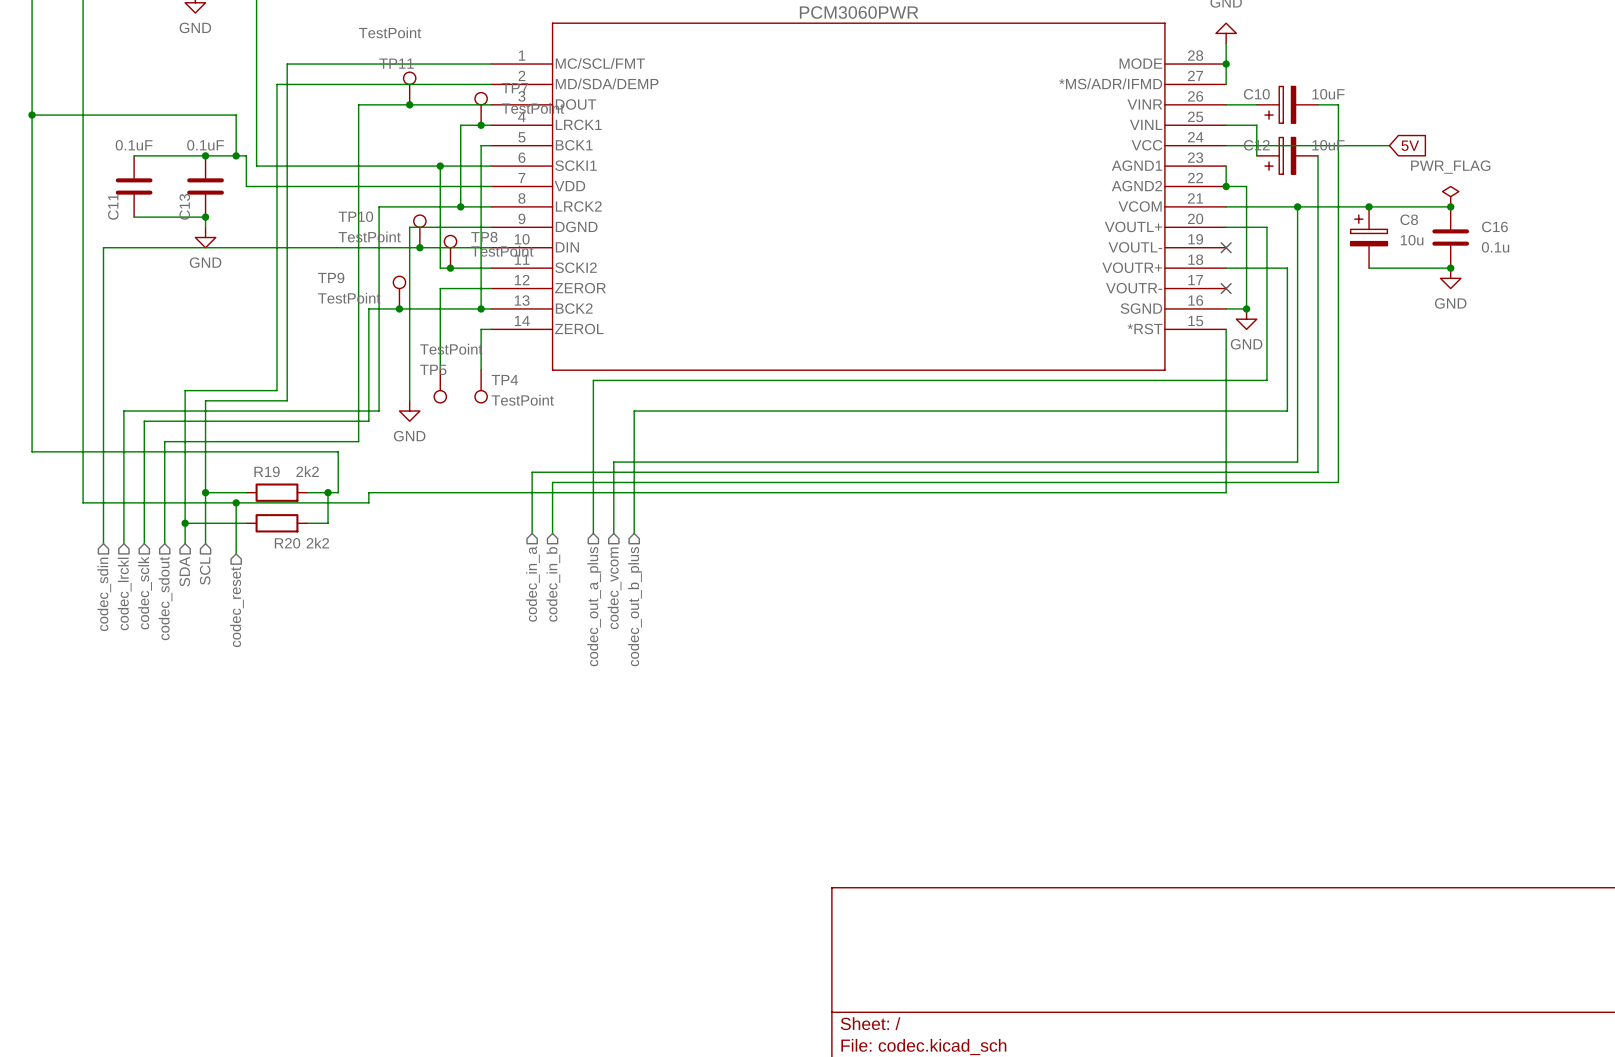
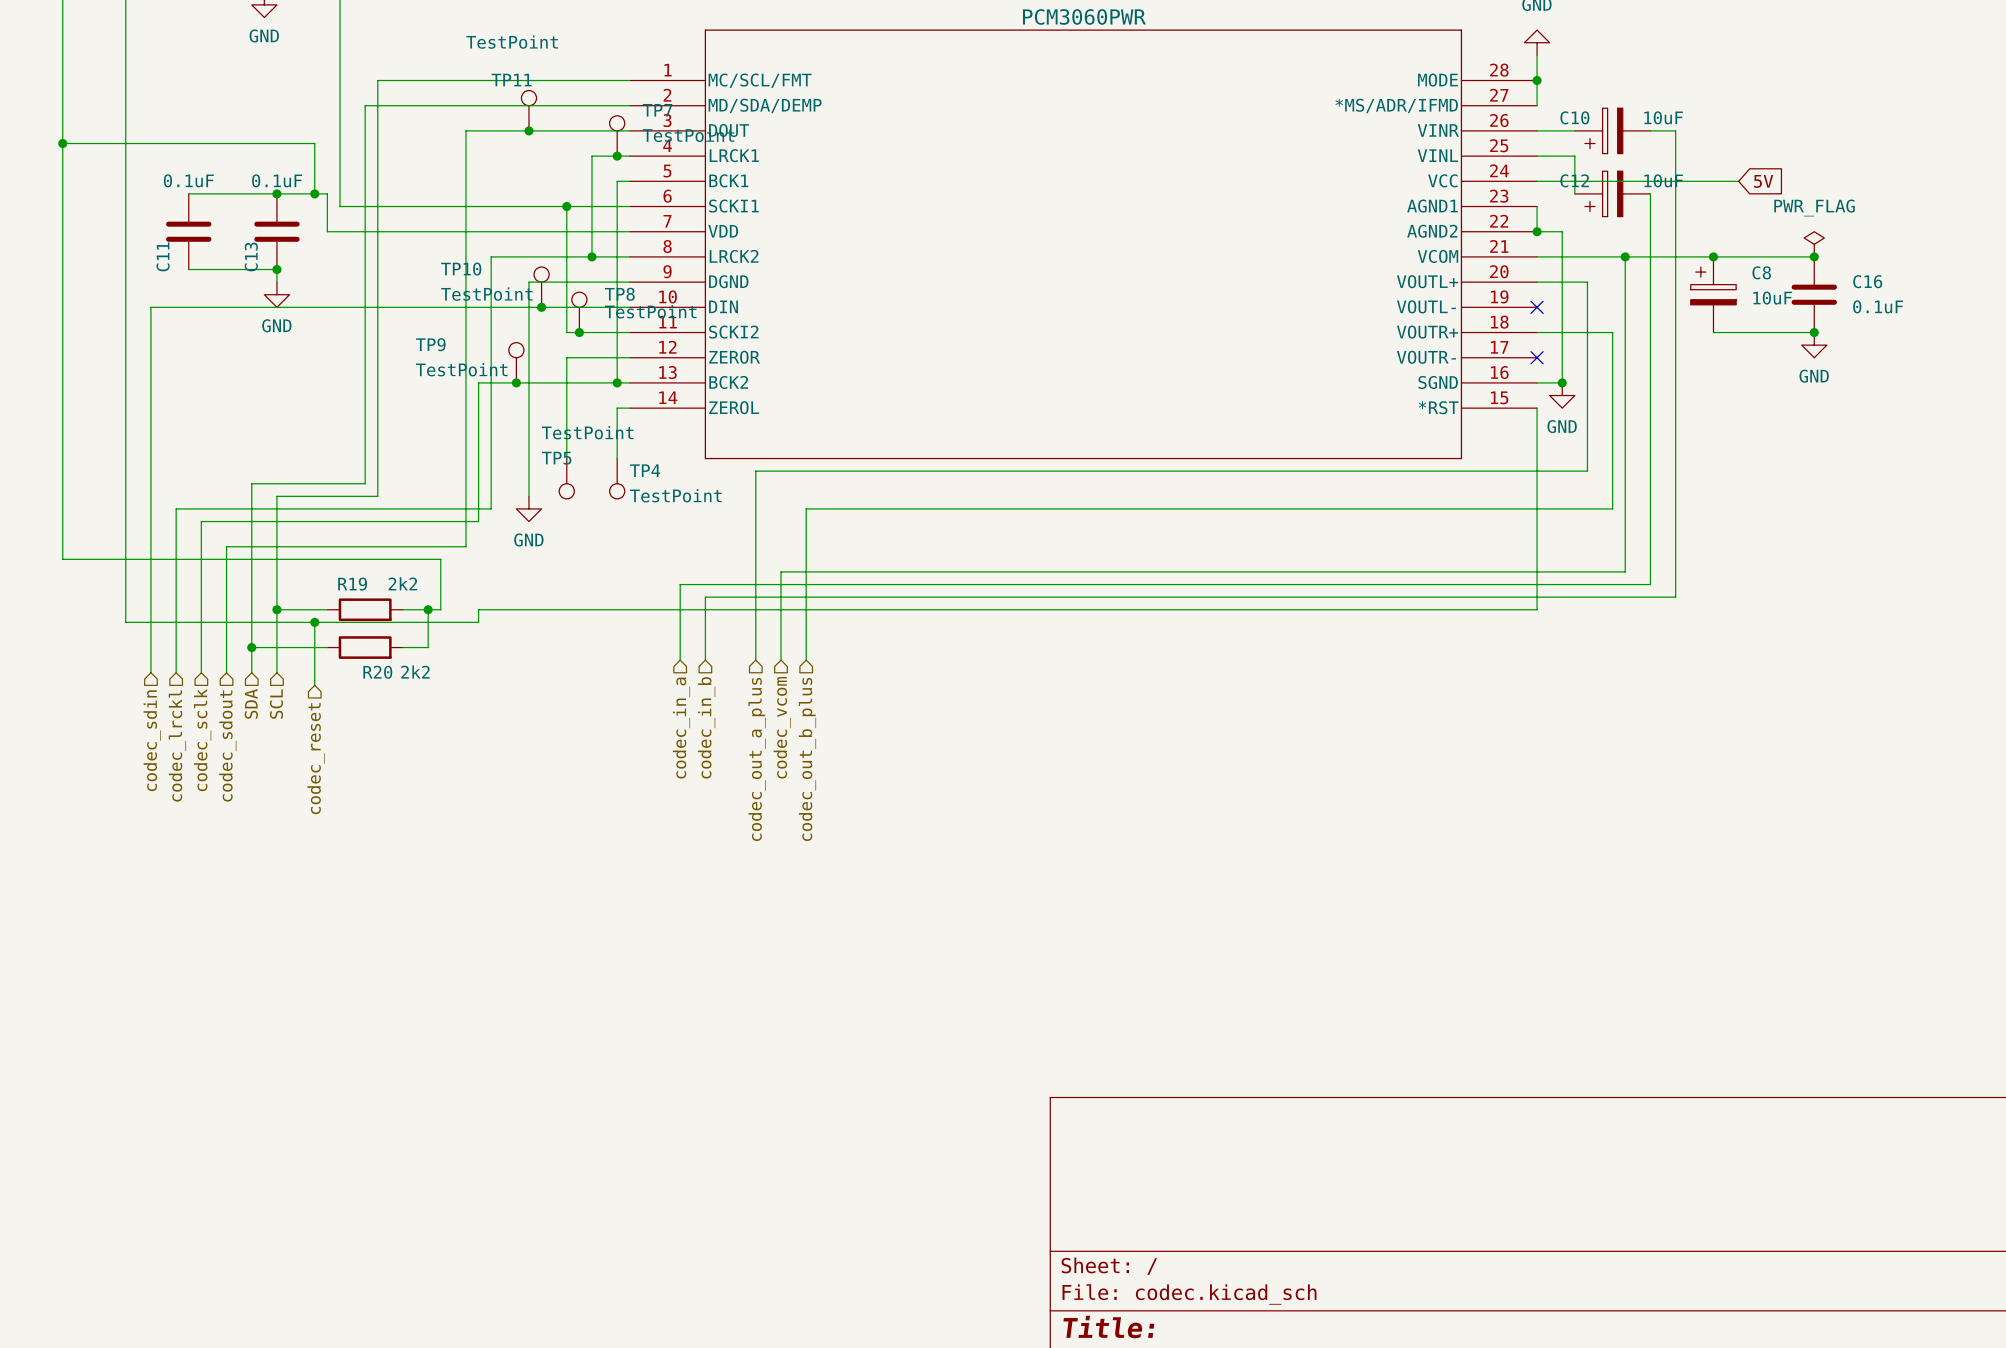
C8 value: 10u (1412, 240) -> 10uF (1772, 298)
C16 value: 0.1u (1495, 247) -> 0.1uF (1878, 306)

